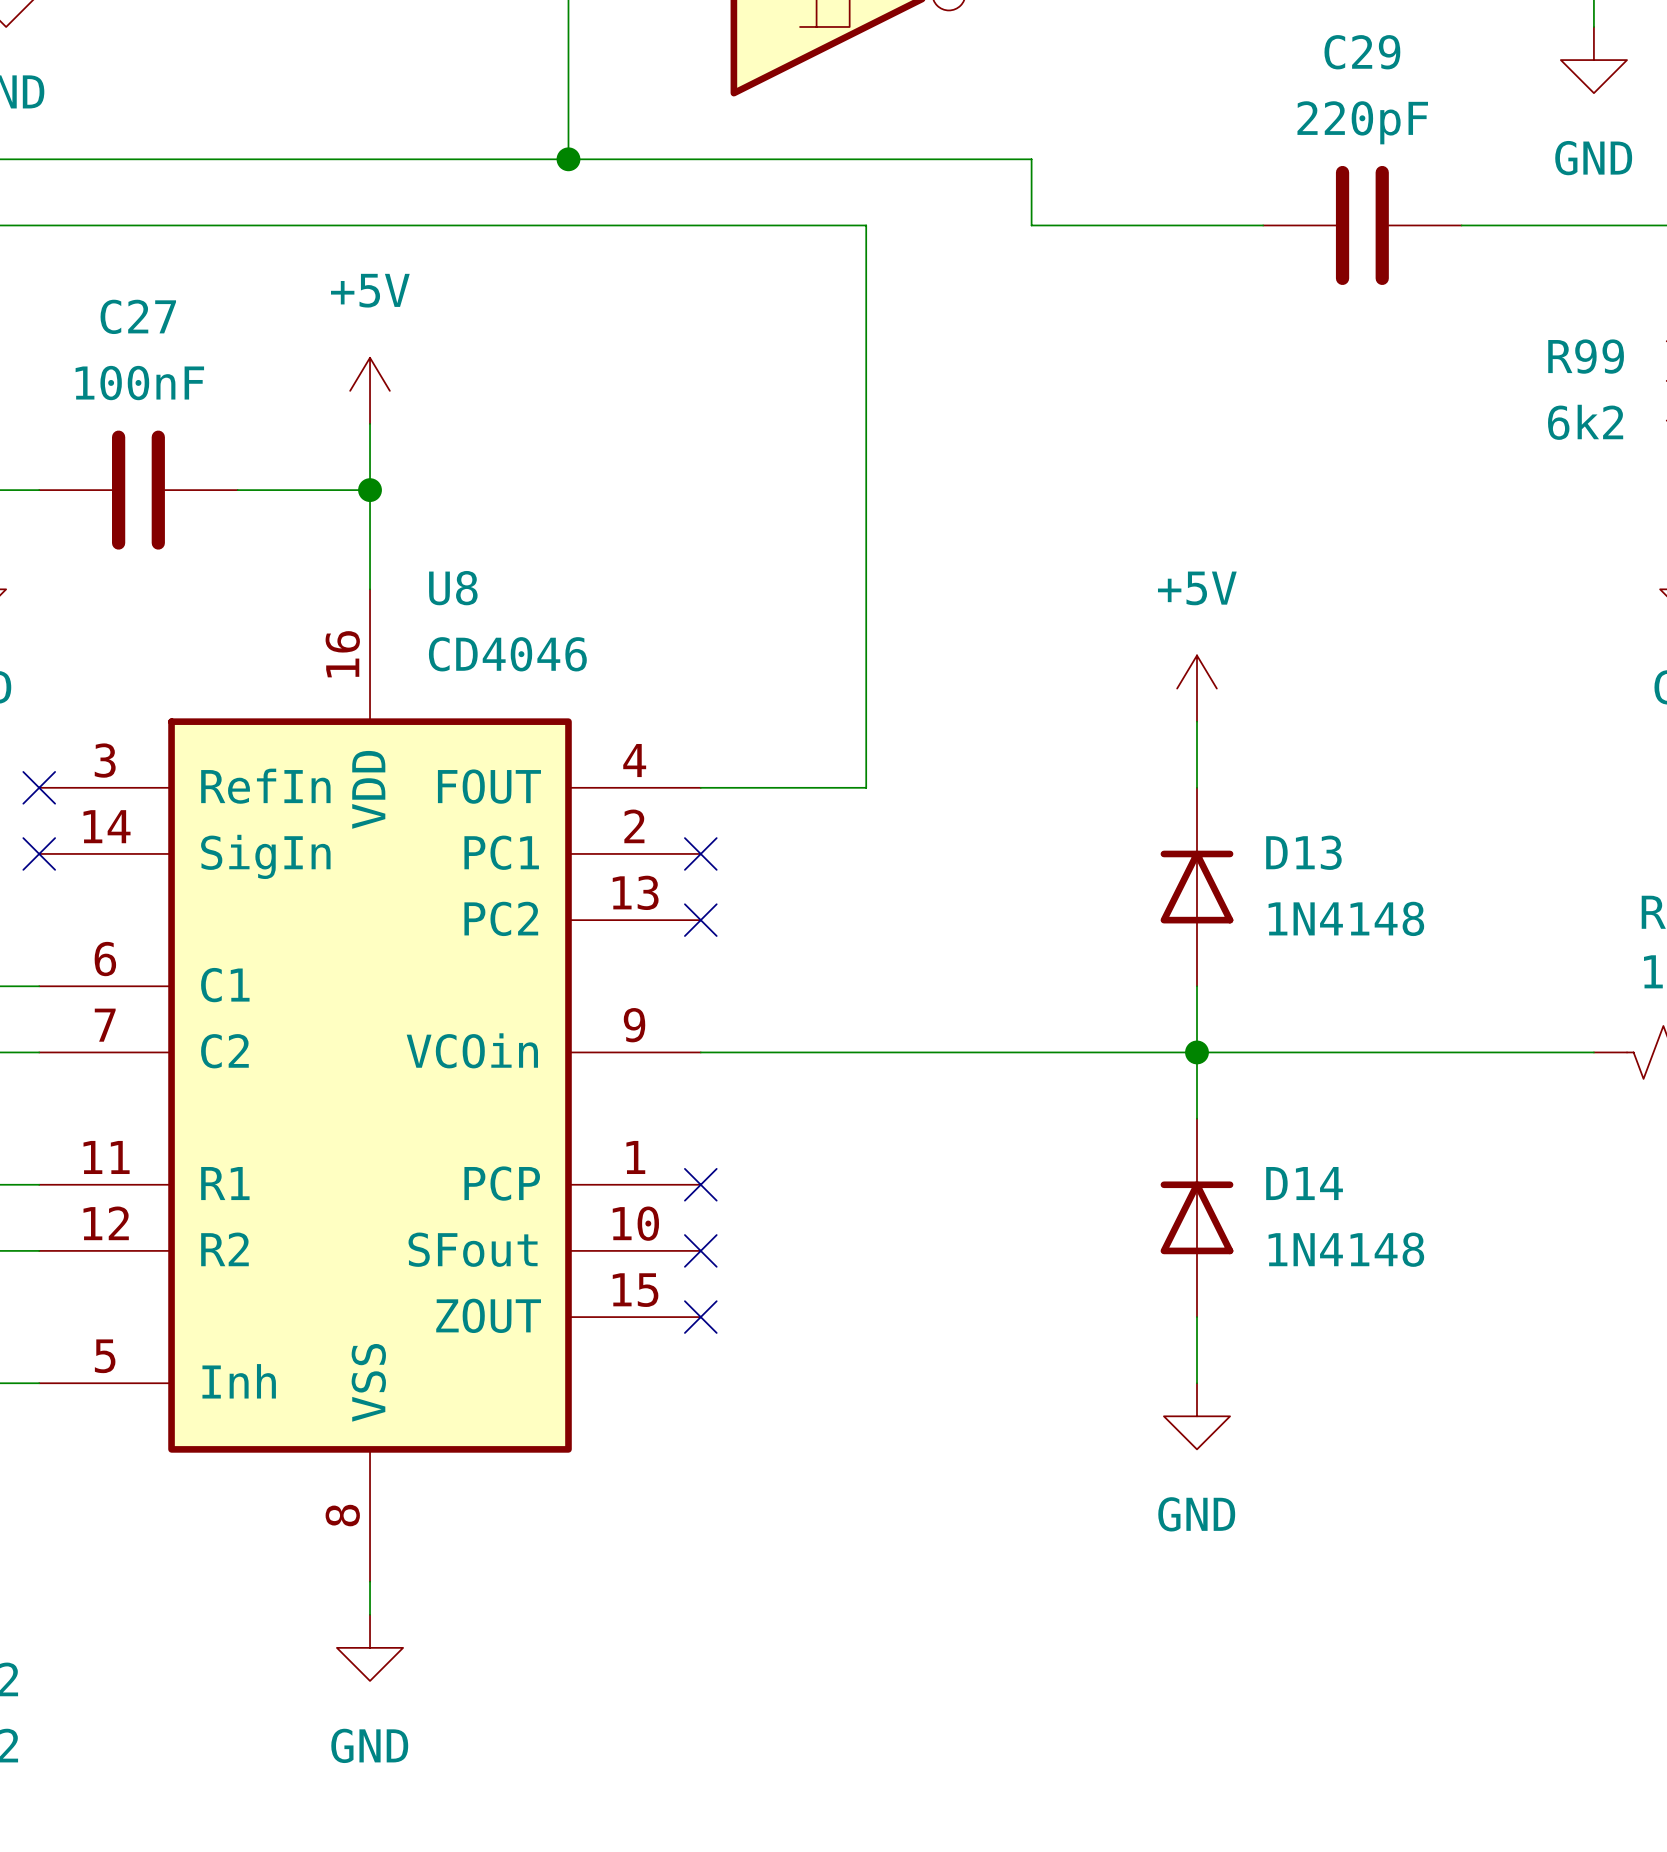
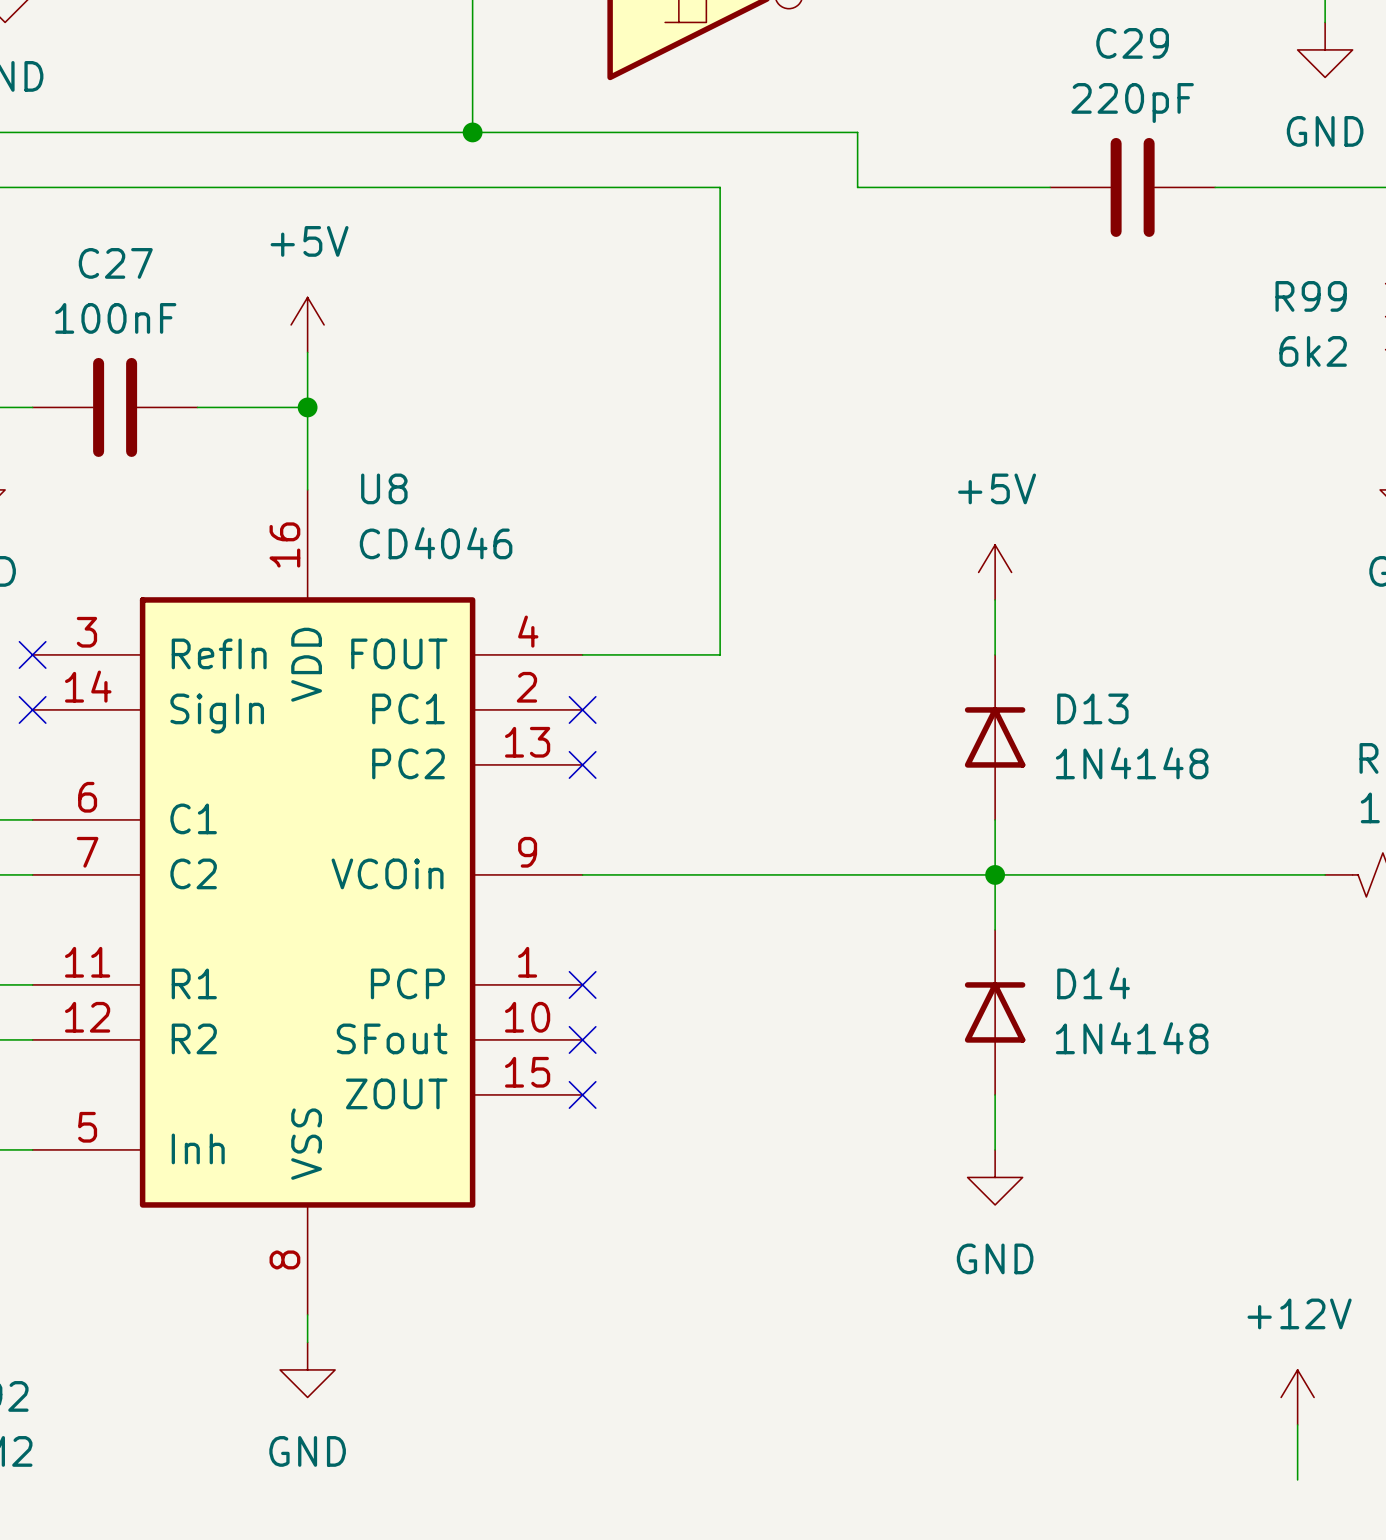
power symbol: none -> +12V (1297, 1397)
wire: none -> (1297, 1424) (1297, 1479)

